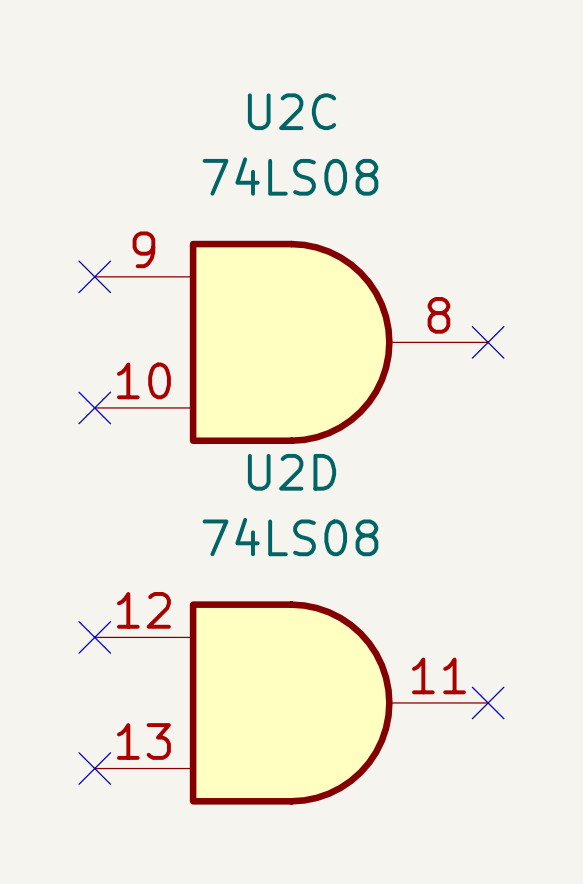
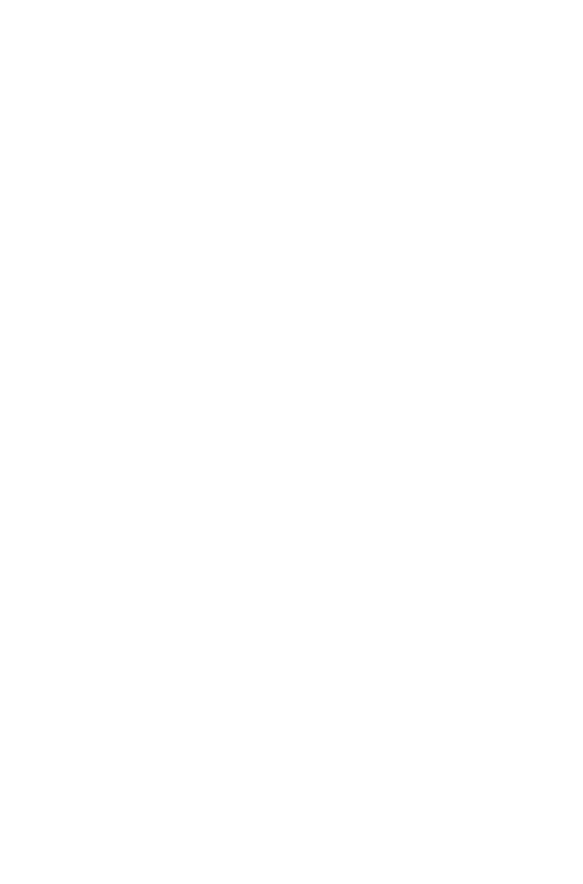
no-connect mark: (94, 276) -> none
U2C: 74LS08 (291, 342) -> none
no-connect mark: (488, 342) -> none
no-connect mark: (94, 407) -> none
no-connect mark: (94, 637) -> none
U2D: 74LS08 (291, 702) -> none
no-connect mark: (488, 702) -> none
no-connect mark: (94, 768) -> none

